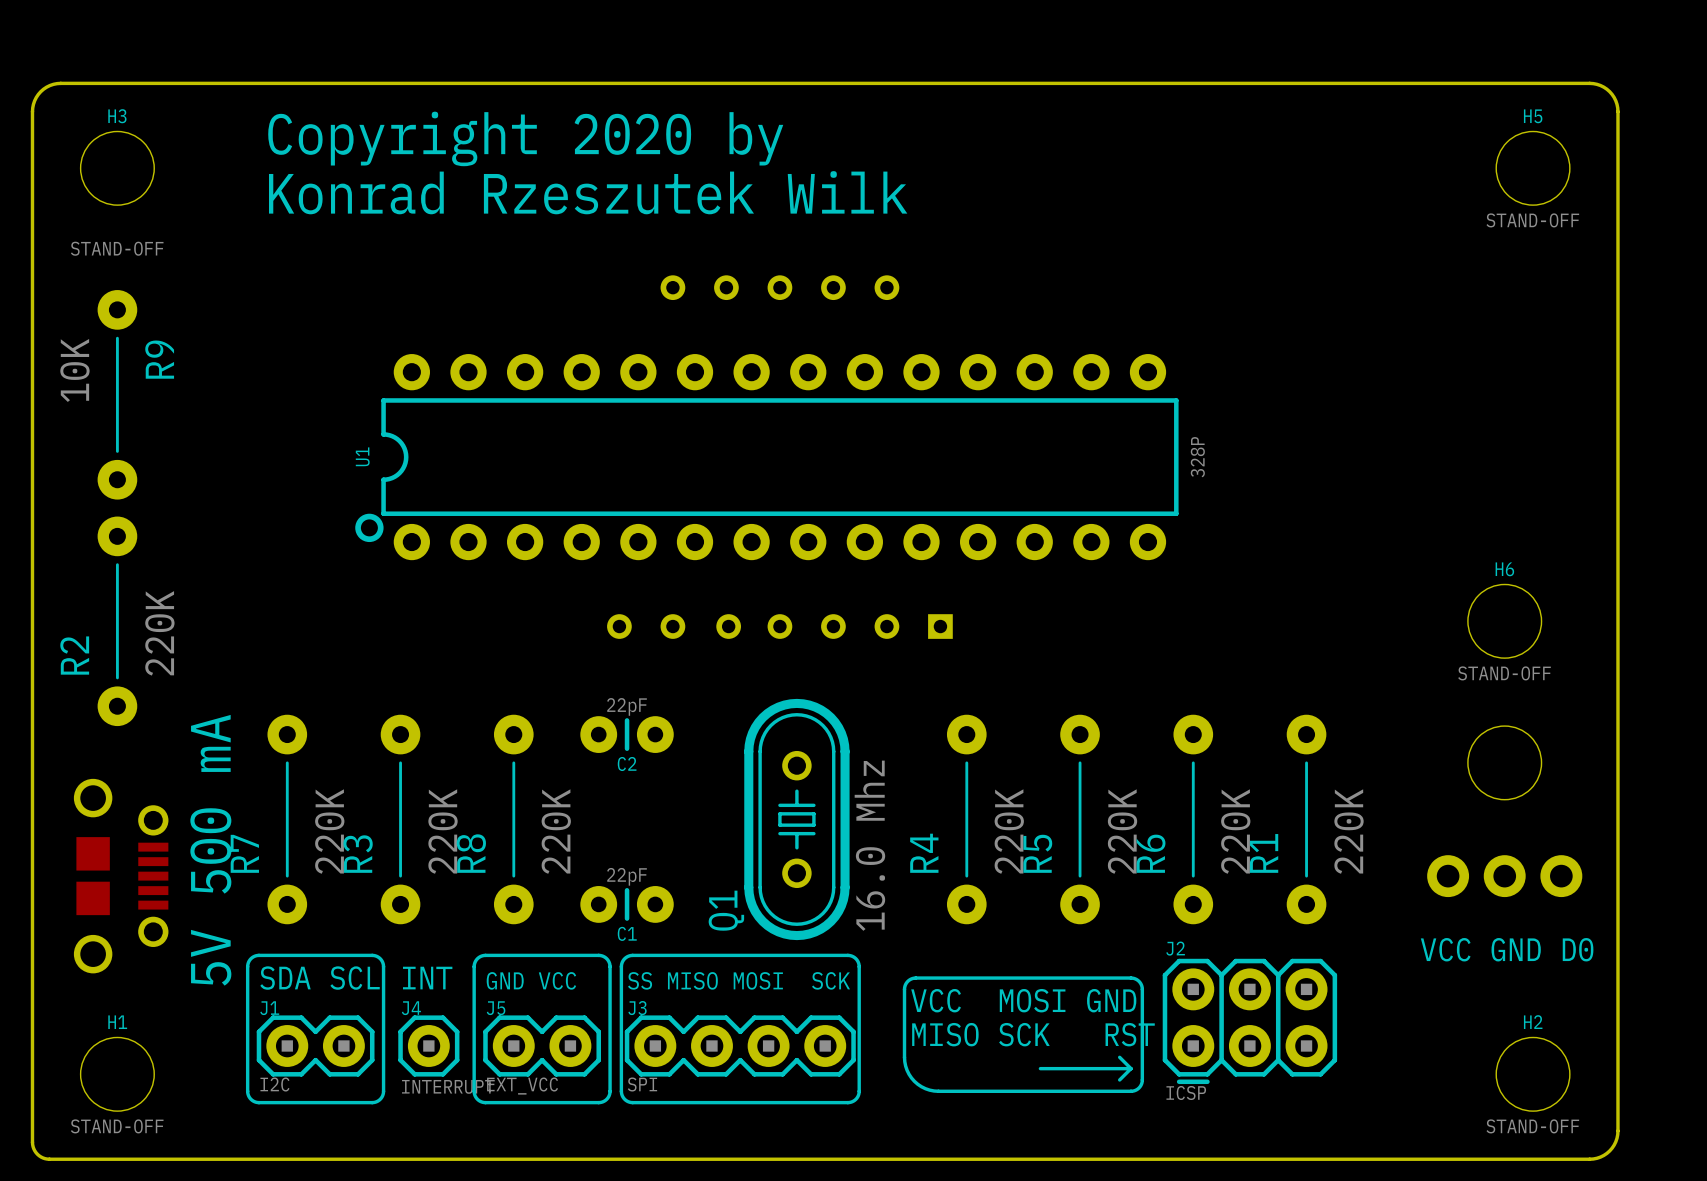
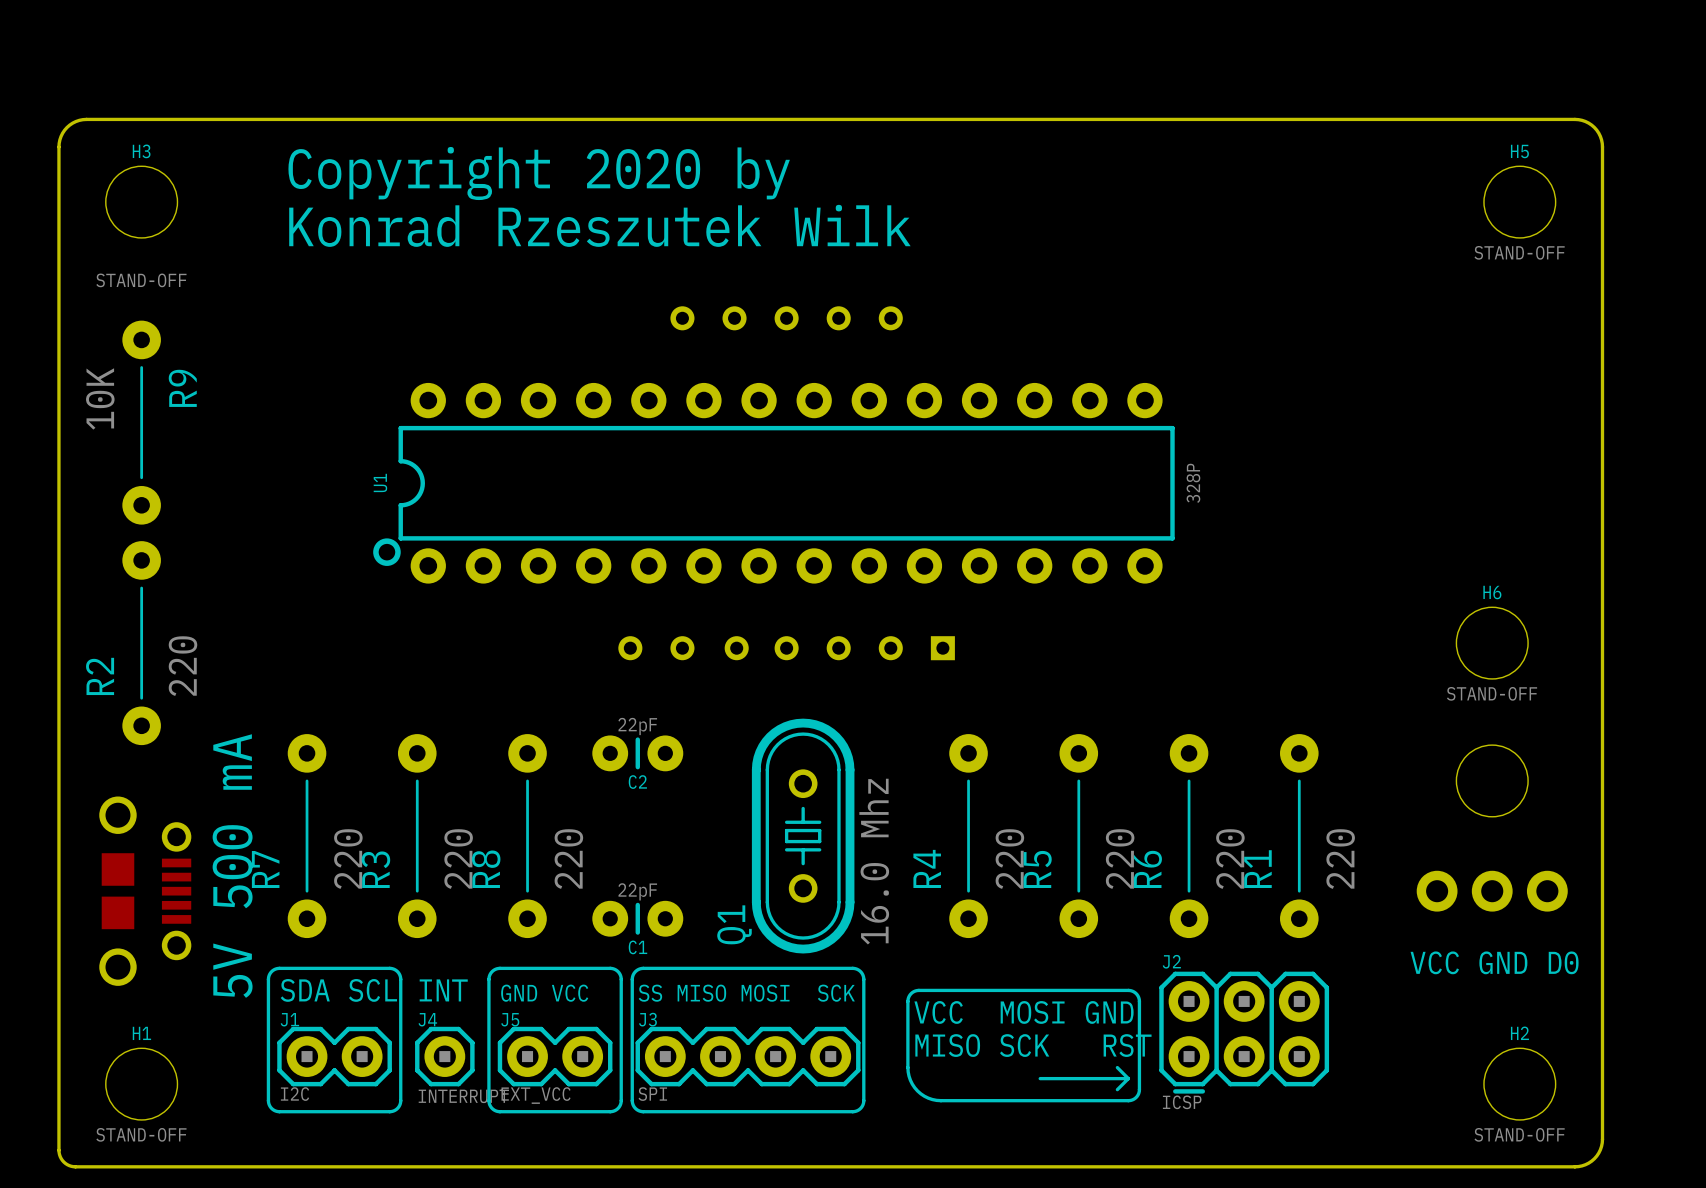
R2 value: 220K (159, 633) -> 220 (182, 666)
R7 value: 220K (329, 831) -> 220 (348, 859)
R3 value: 220K (443, 831) -> 220 (458, 859)
R8 value: 220K (556, 831) -> 220 (568, 859)
R4 value: 220K (1009, 831) -> 220 (1009, 859)
R5 value: 220K (1122, 831) -> 220 (1120, 859)
R6 value: 220K (1235, 831) -> 220 (1230, 859)
R1 value: 220K (1349, 831) -> 220 (1340, 859)

